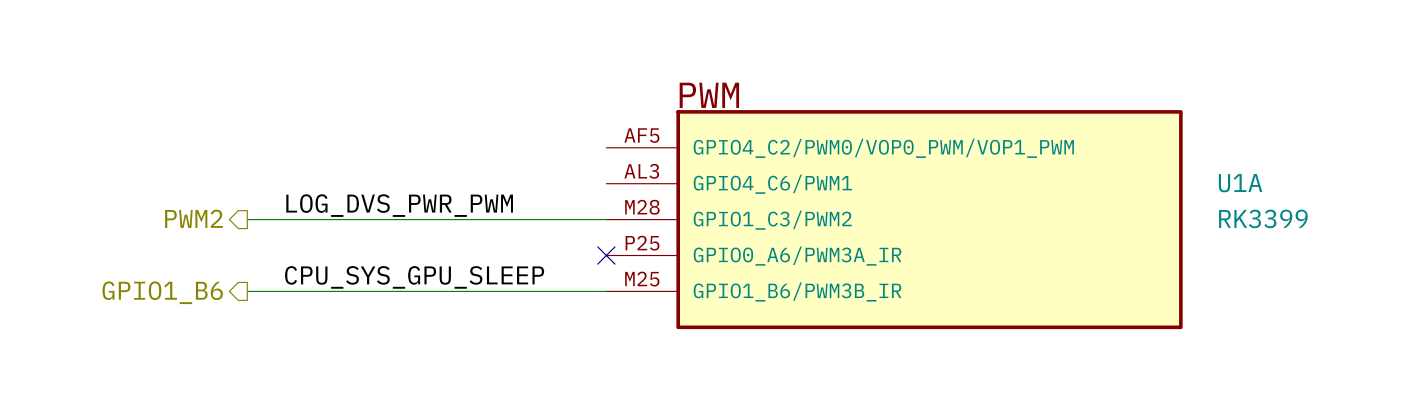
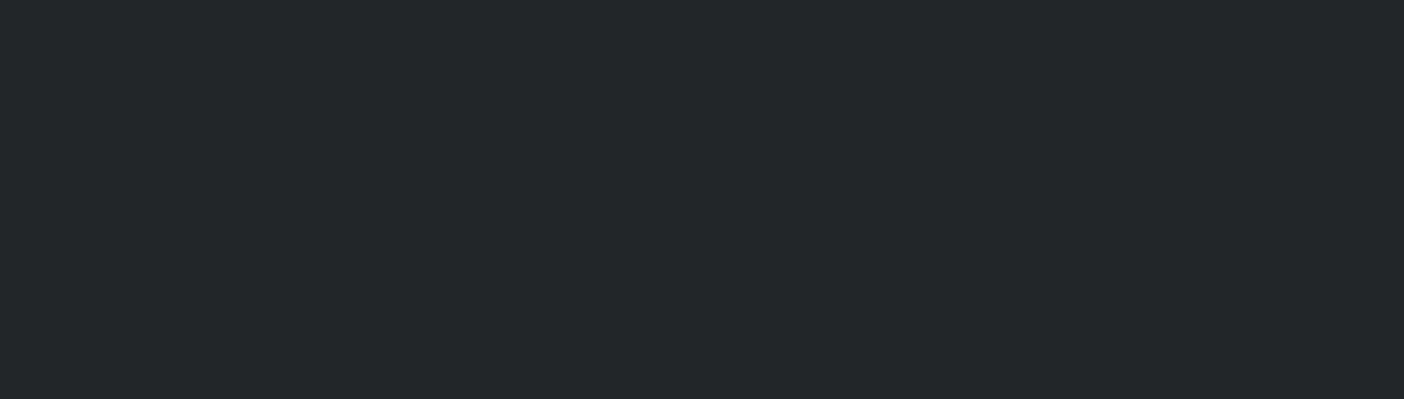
label: LOG_DVS_PWR_PWM (399, 205) -> none
hierarchical label: PWM2 (194, 218) -> none
wire: (247, 219) (606, 219) -> none
U1A: RK3399 (894, 219) -> none
no-connect mark: (606, 255) -> none
label: CPU_SYS_GPU_SLEEP (414, 277) -> none
wire: (247, 291) (606, 291) -> none
hierarchical label: GPIO1_B6 (162, 292) -> none

